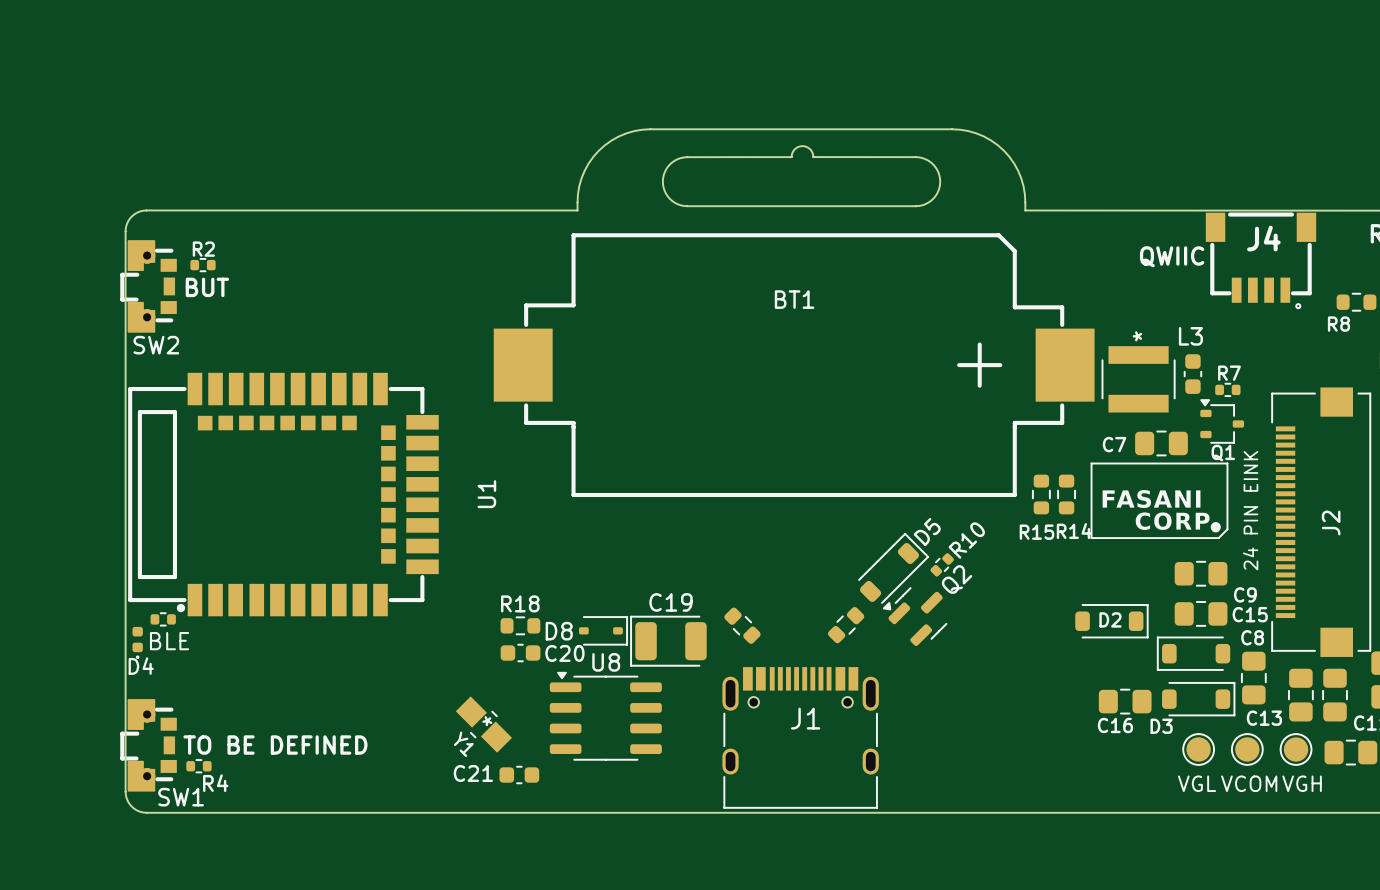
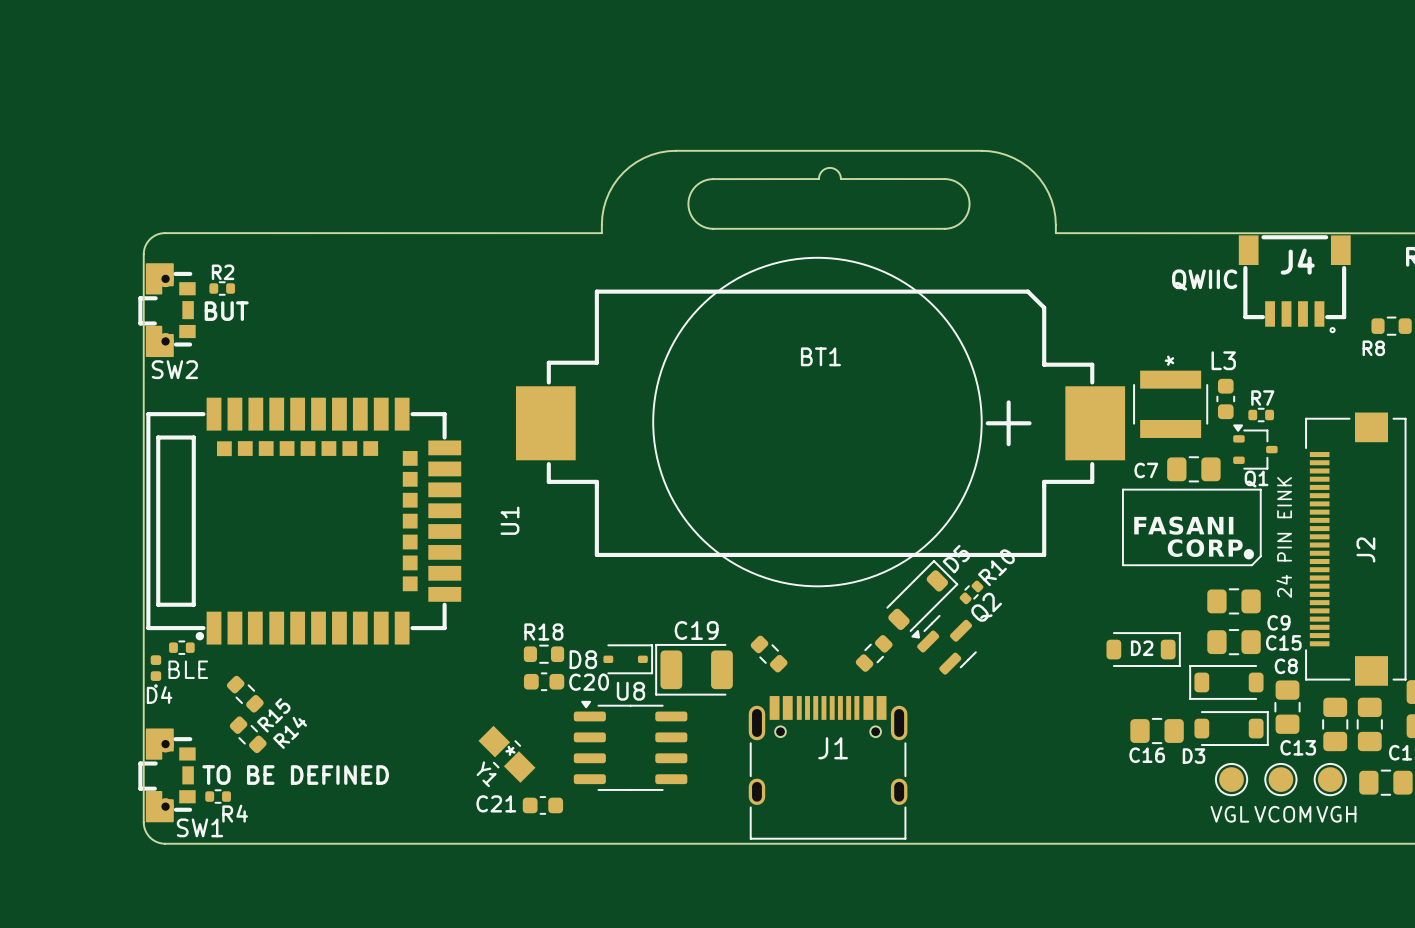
drawing: none -> [652, 256, 983, 588]
BT1 position: (794, 365) -> (820, 423)
R15 rotation: 0° (1041, 494) -> 45° counterclockwise (245, 694)
R15 position: (1041, 494) -> (245, 694)
R14 rotation: 0° (1066, 494) -> 45° counterclockwise (248, 734)
R14 position: (1066, 494) -> (248, 734)

